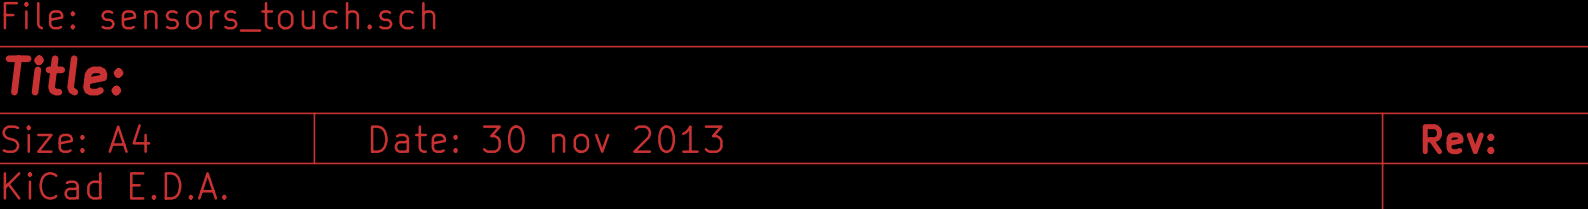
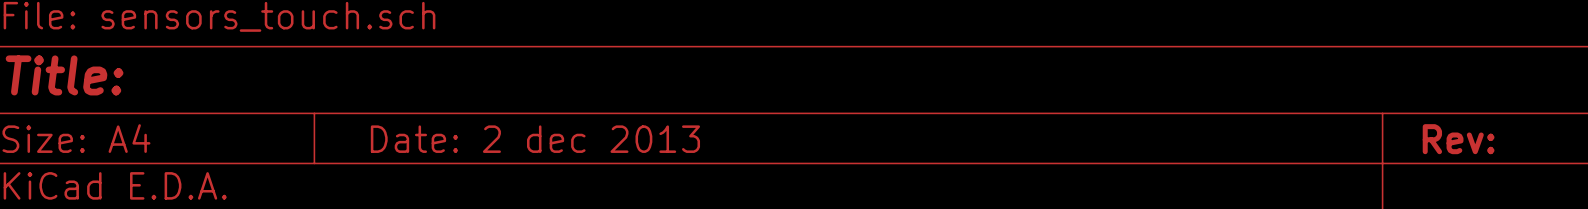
title block: Date: 30 nov 2013 (546, 139) -> Date: 2 dec 2013 (535, 139)

